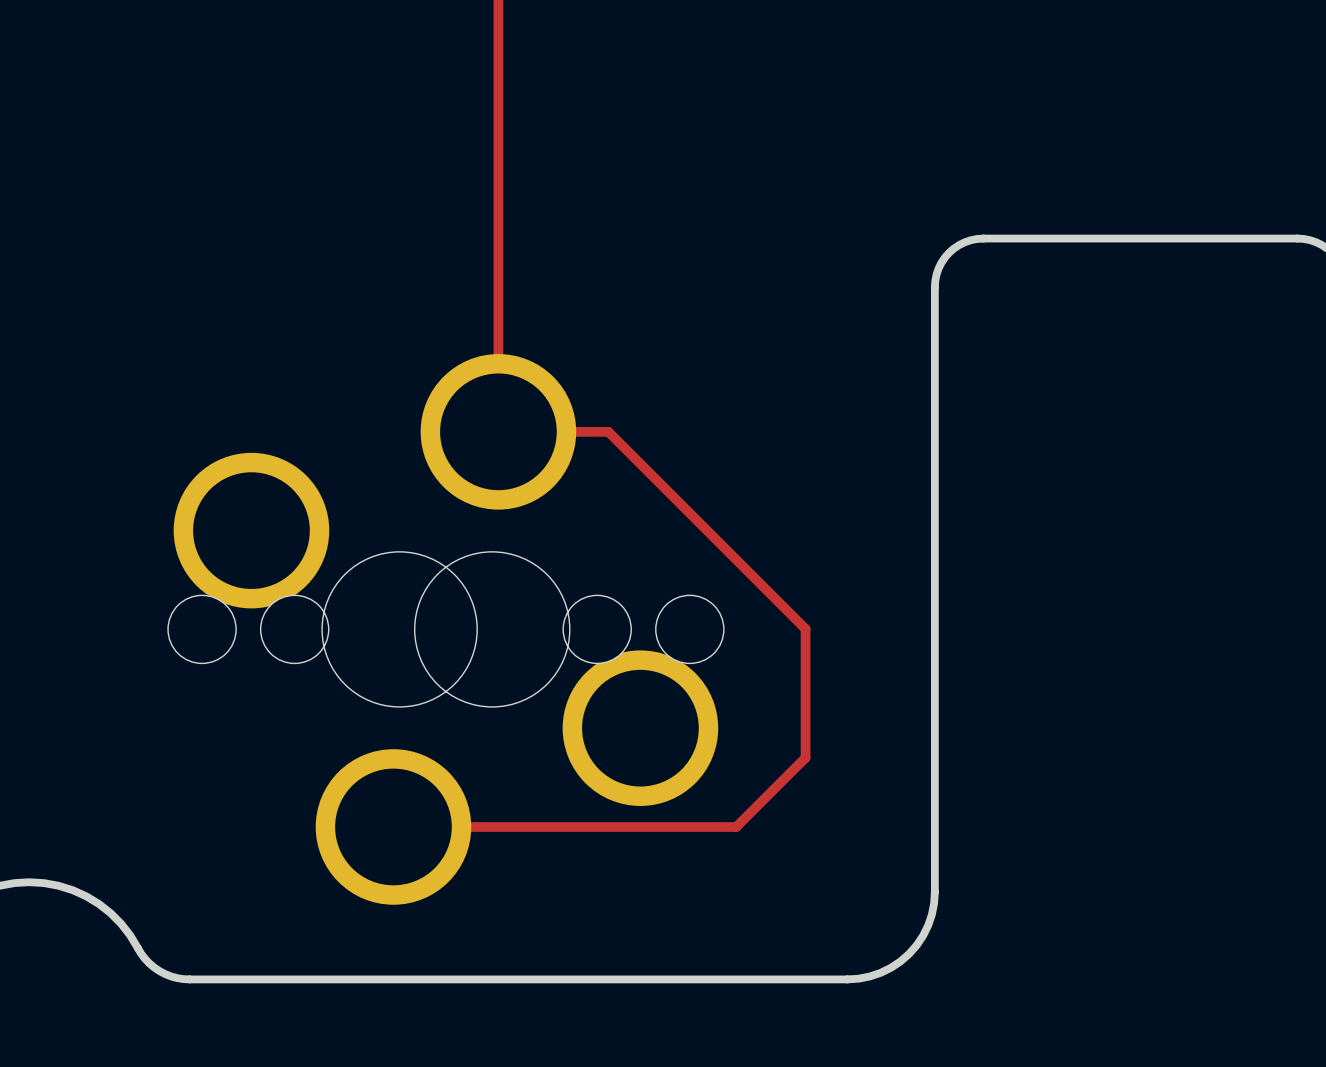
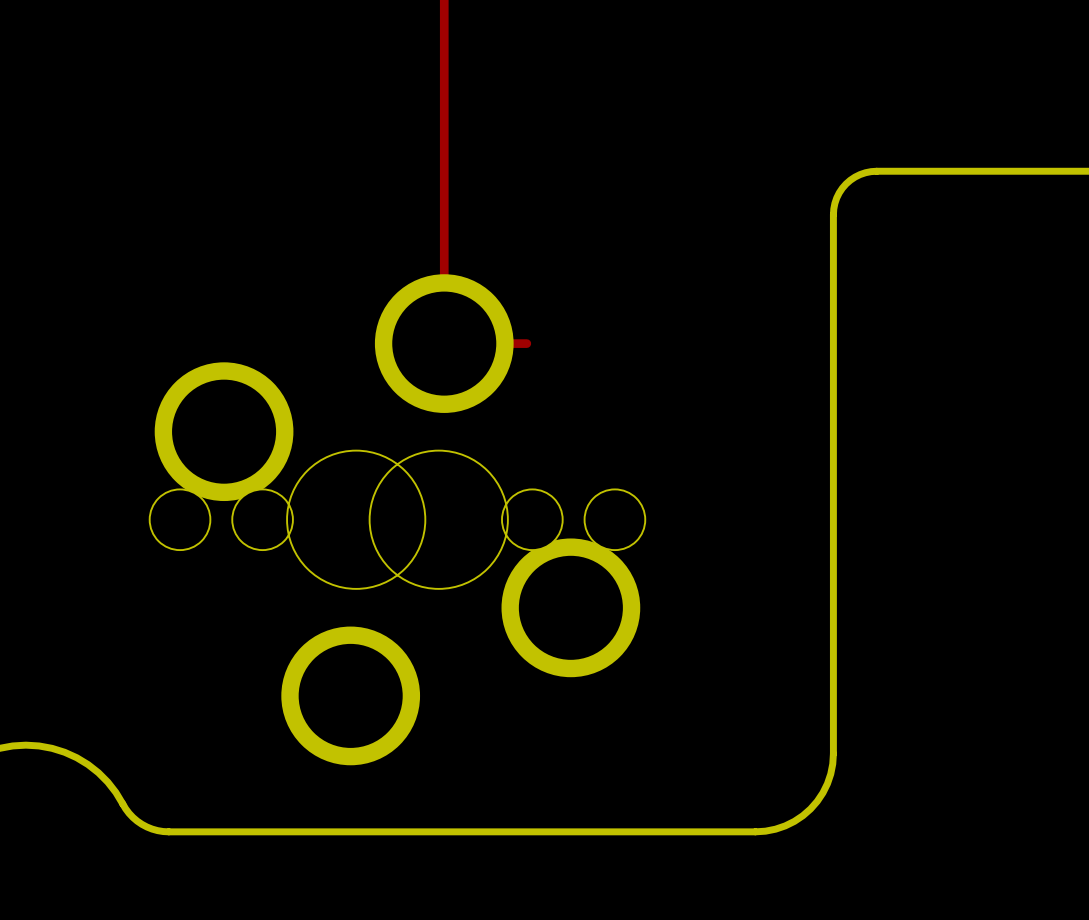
track: (591, 431) (608, 431) (805, 628) (805, 757) (736, 826) (393, 826) -> none

